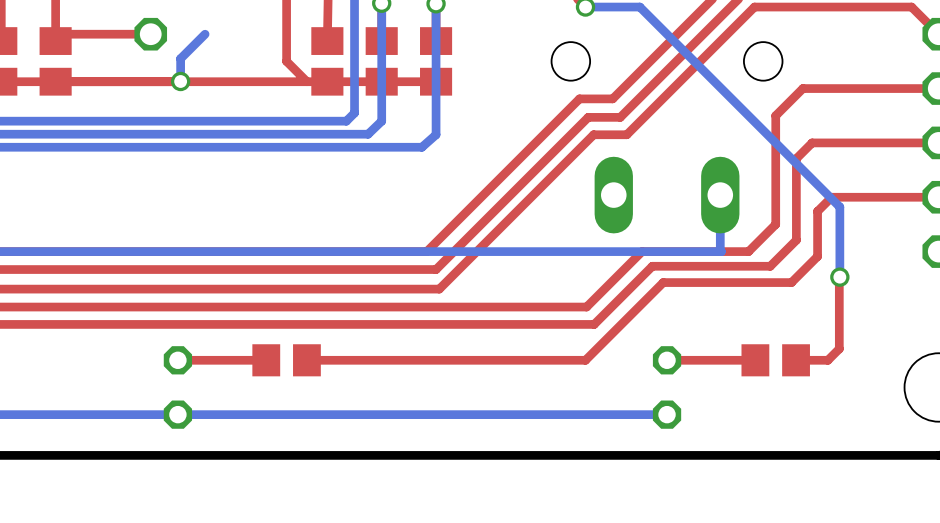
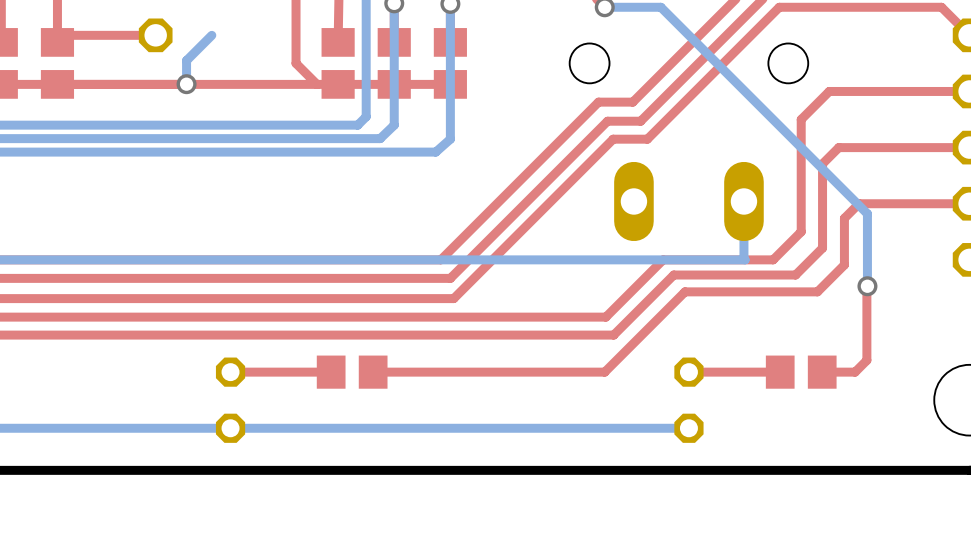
top track: (223, 360) (177, 360) -> none
part position: (286, 360) -> (352, 372)
top track: (361, 360) (320, 360) -> (317, 372) (275, 372)
part position: (177, 387) -> (230, 400)

